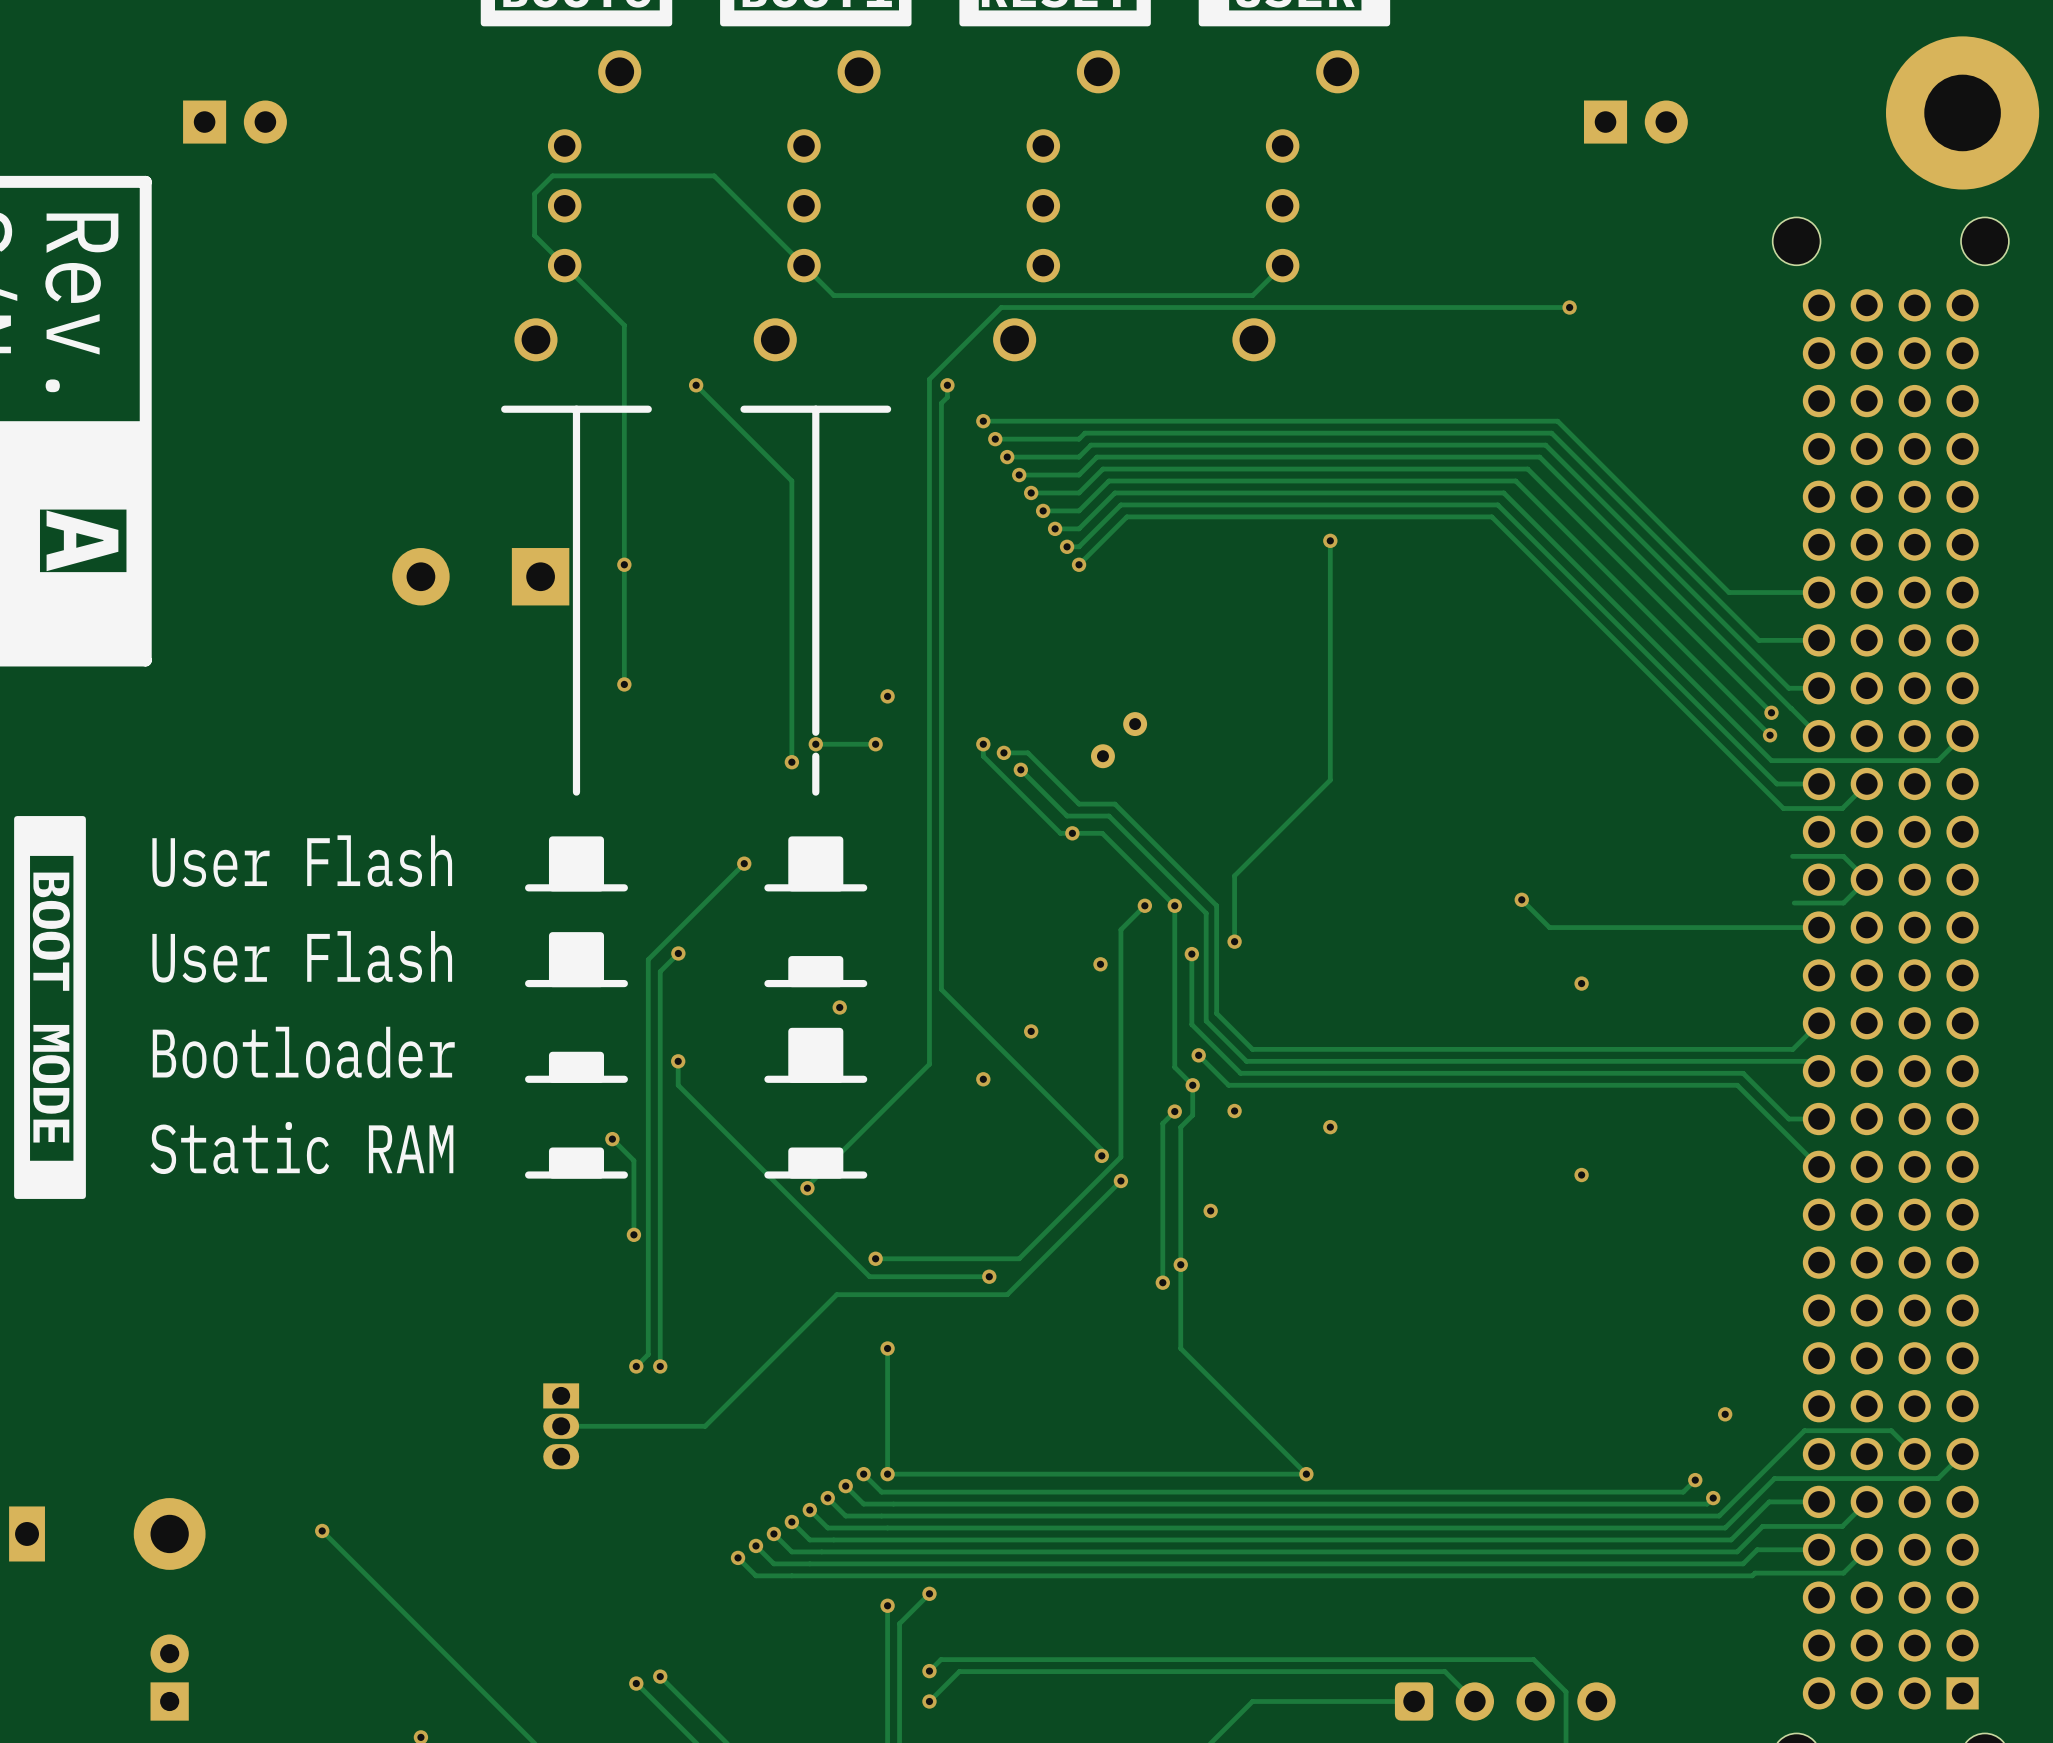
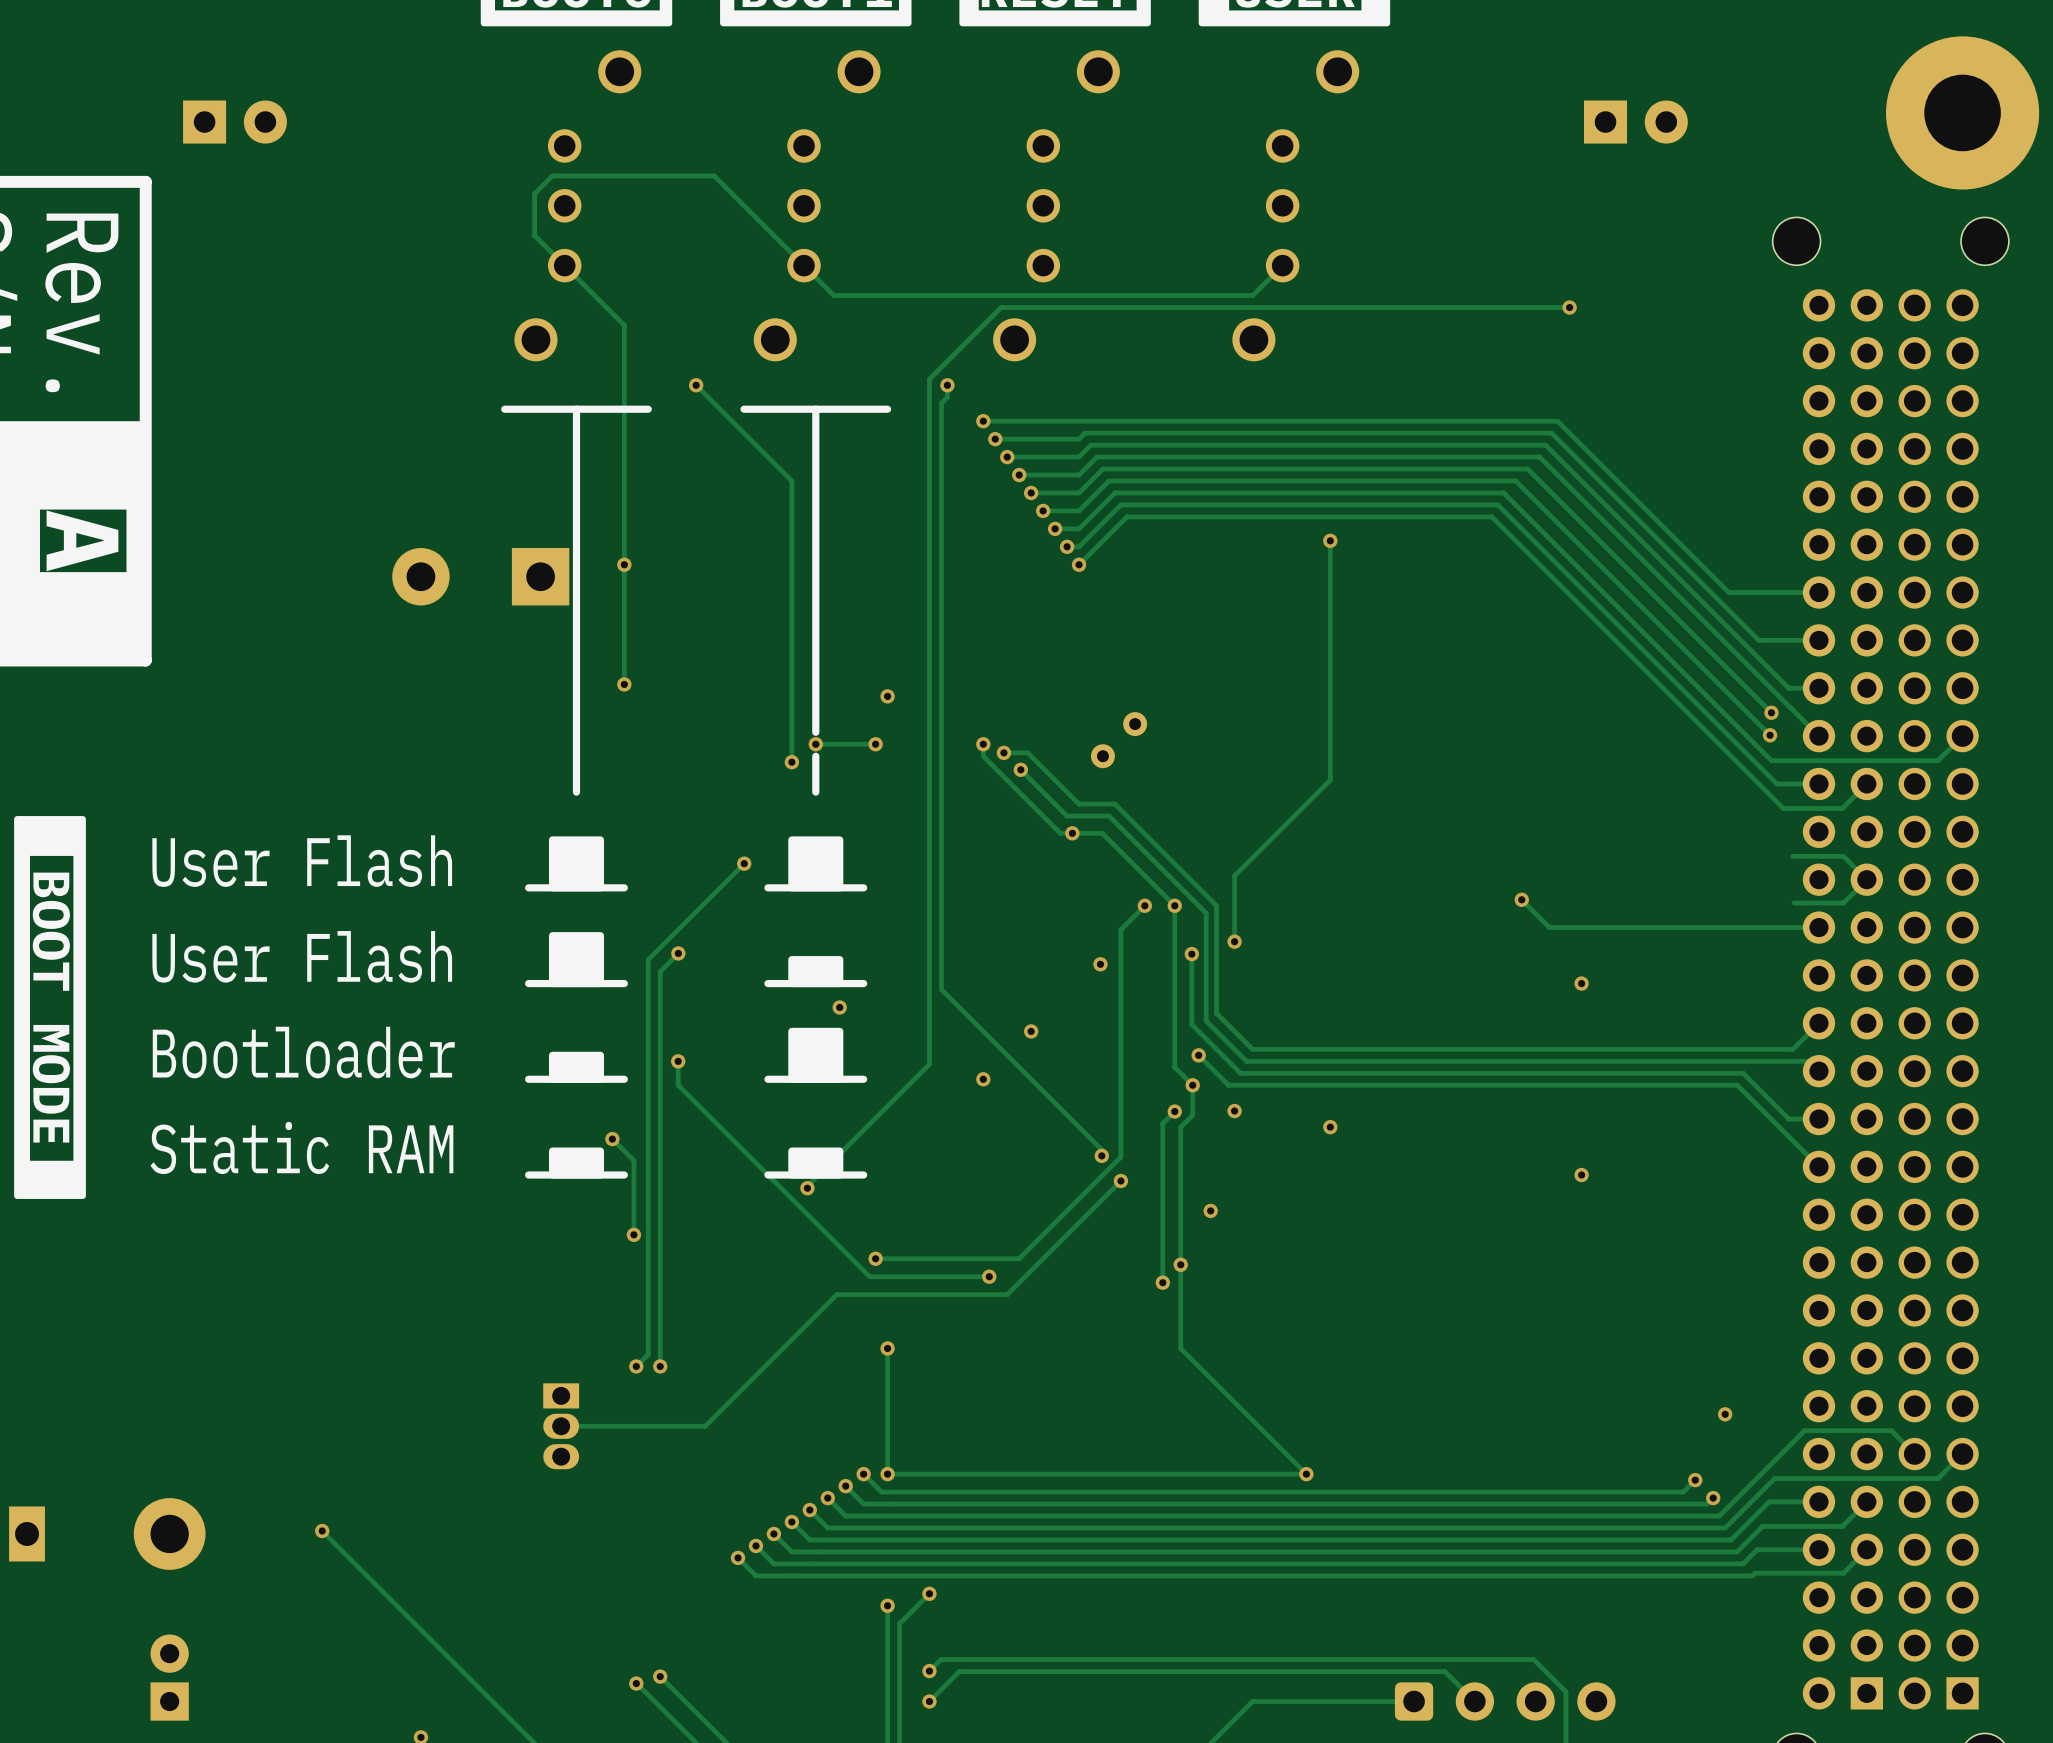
part footprint: [1802, 289, 1884, 1710] -> [1802, 289, 1884, 1710]

